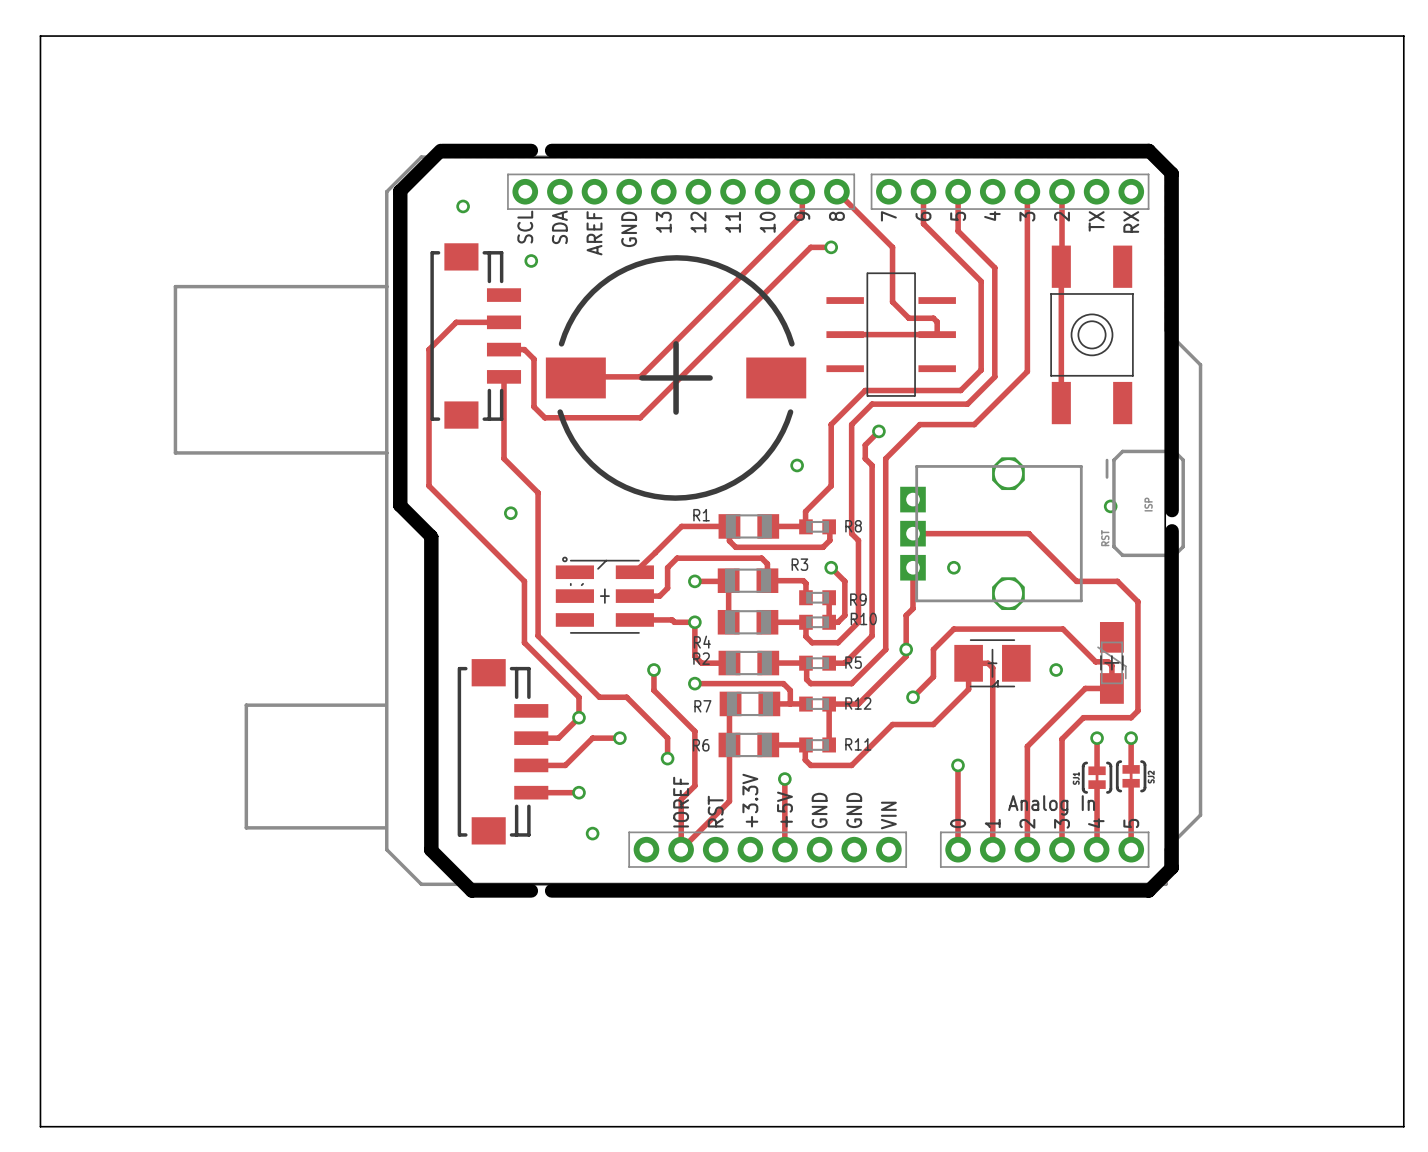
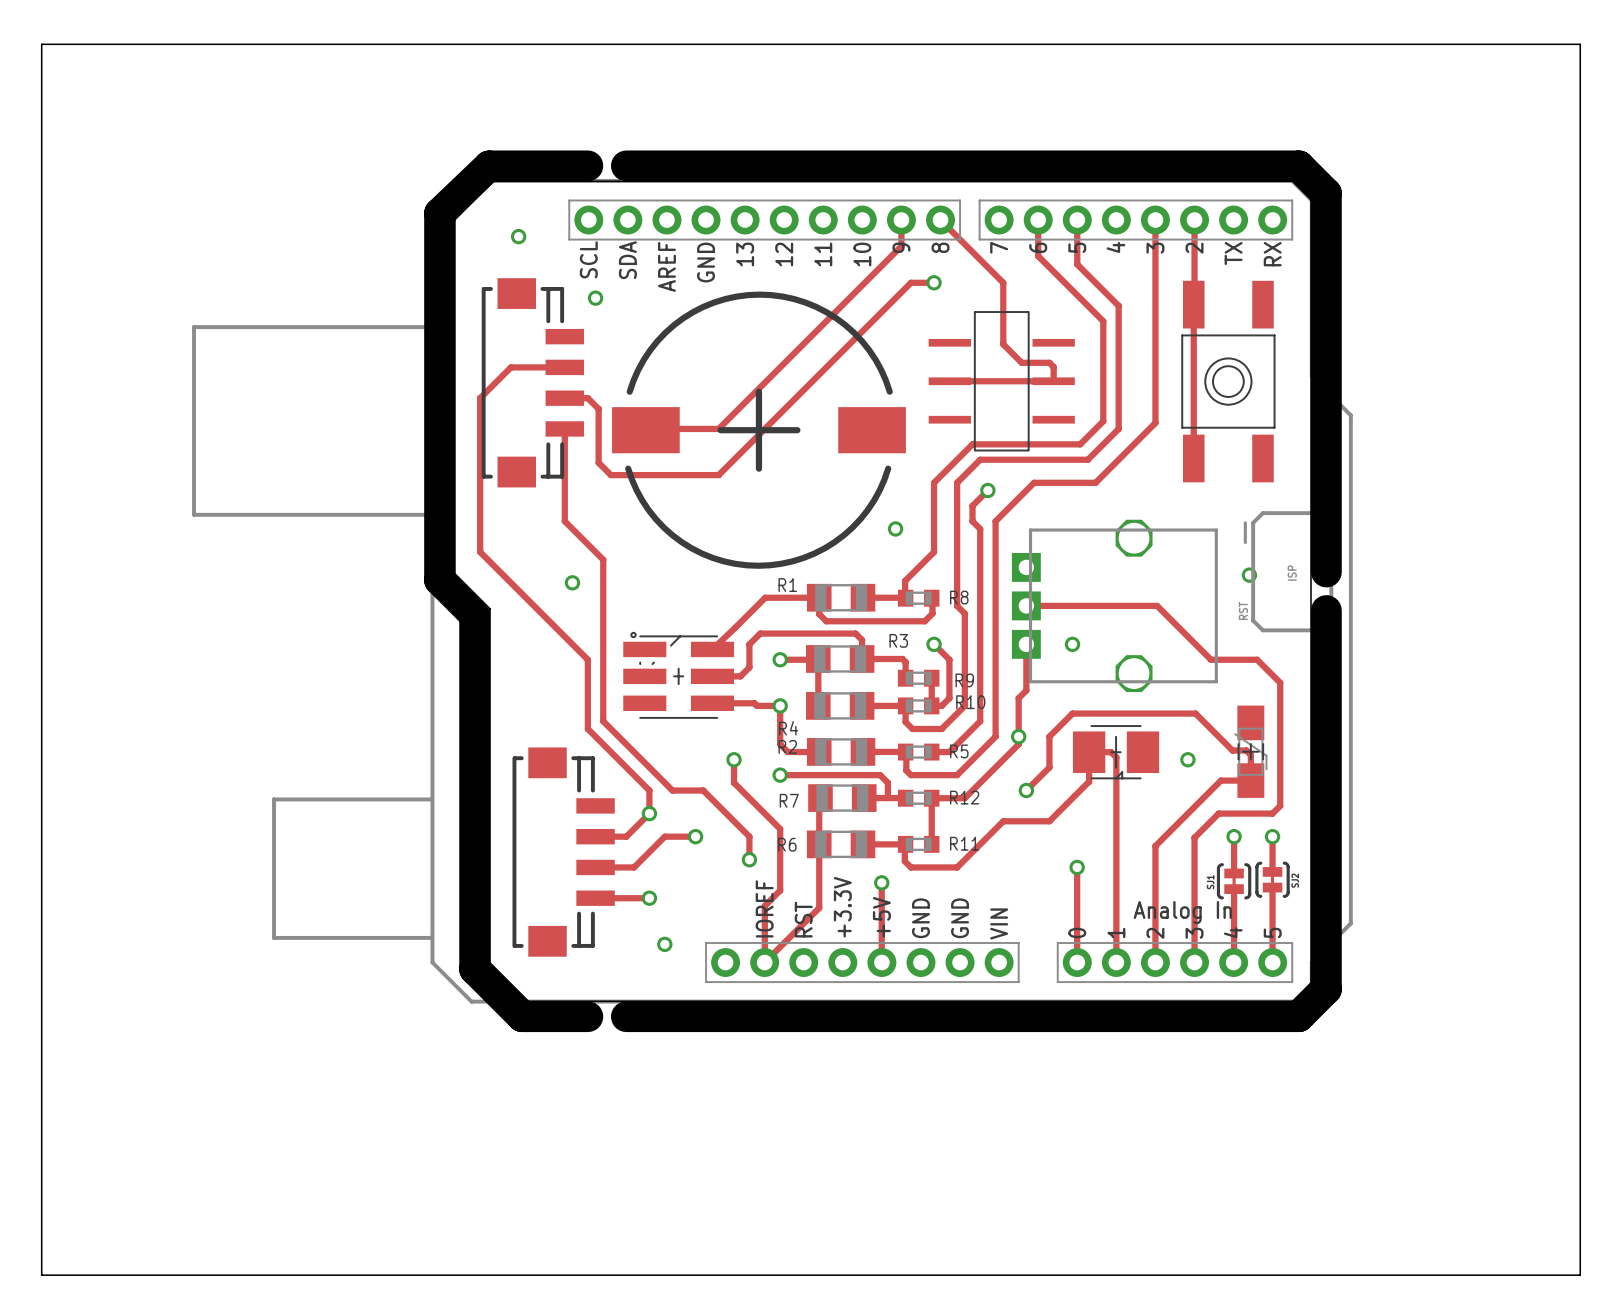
board edge: none -> (587, 165) (489, 165) (439, 213) (439, 580) (474, 615) (474, 969) (522, 1016) (587, 1016)
board edge: none -> (626, 165) (1299, 165) (1326, 193) (1326, 572)
board edge: (440, 150) (399, 191) (399, 505) (430, 536) (430, 849) (471, 890) (531, 890) -> none
board edge: (442, 150) (531, 150) -> none
board edge: (551, 150) (1148, 150) (1172, 173) (1172, 510) -> none
board edge: (1172, 530) (1172, 867) (1148, 890) (551, 890) -> none
board edge: none -> (1326, 610) (1326, 989) (1299, 1016) (626, 1016)

